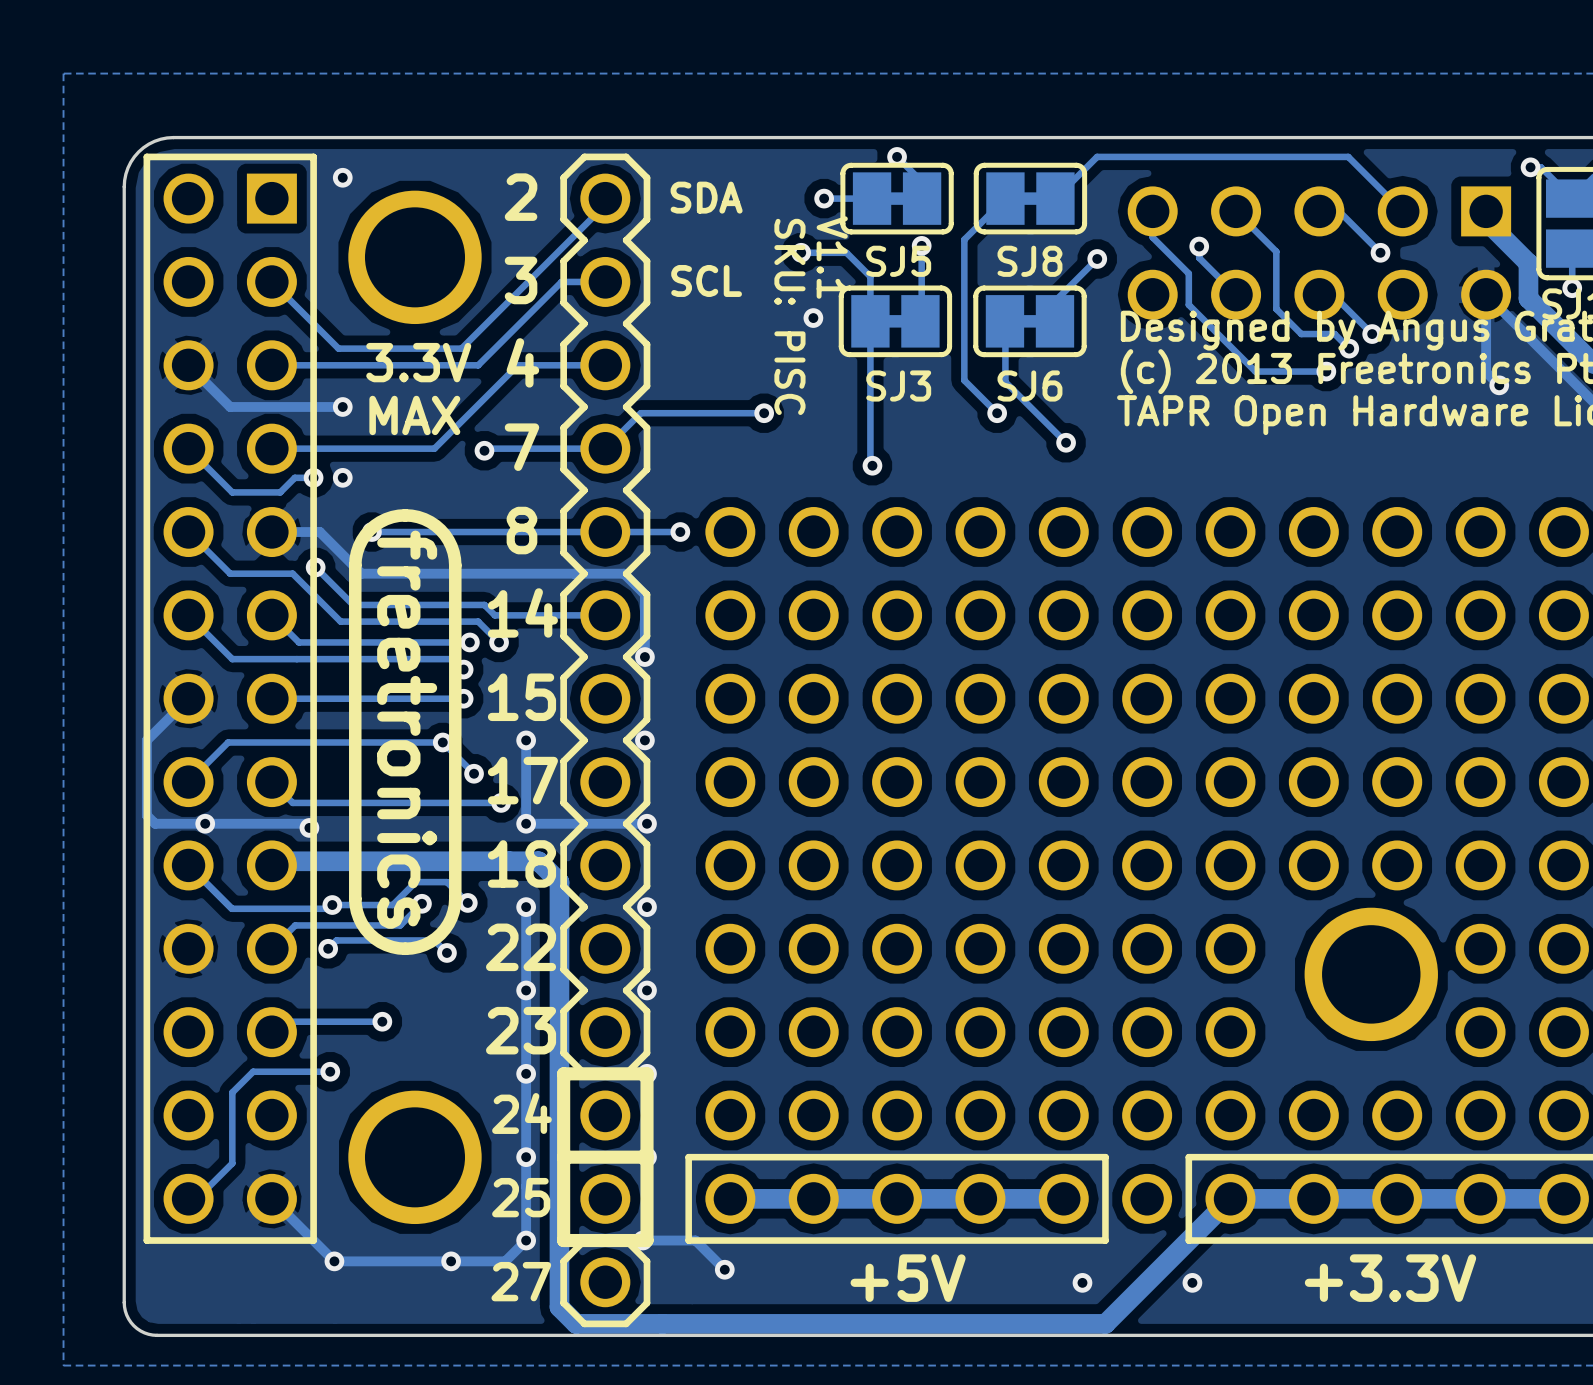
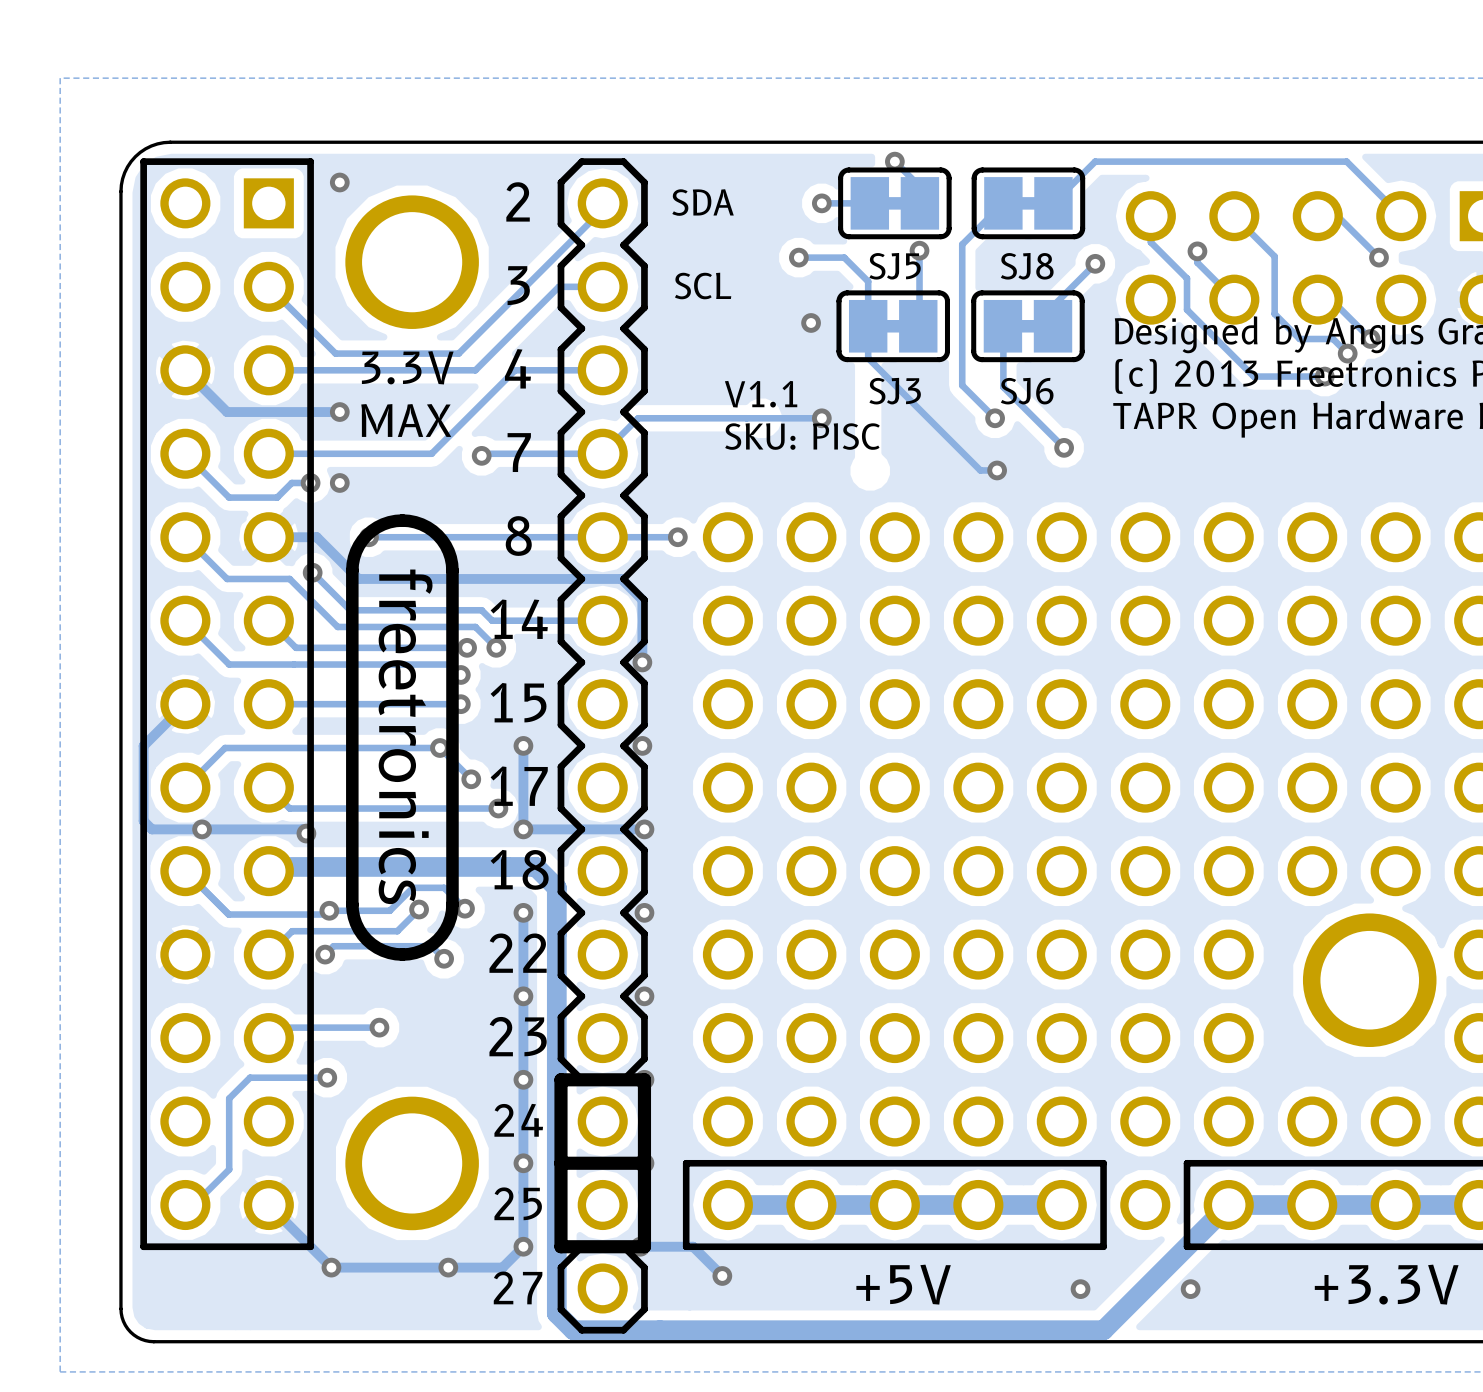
text rotation: 0° (832, 257) -> 90° counterclockwise (761, 394)
text position: V1.1 (832, 257) -> V1.1 (761, 394)
text rotation: 0° (789, 316) -> 90° counterclockwise (802, 436)
track: (870, 353) (870, 463) (872, 465) -> (868, 358) (980, 470) (997, 470)
via: (764, 413) -> none
via: none -> (821, 418)
via: (872, 465) -> none
via: none -> (997, 470)

